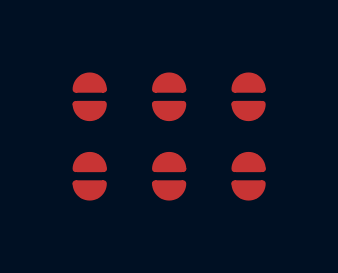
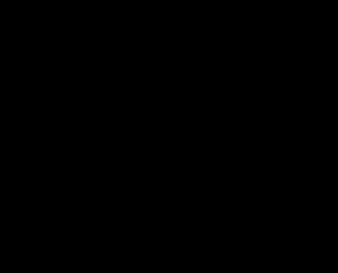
part: (89, 96) -> none
part: (169, 96) -> none
part: (248, 96) -> none
part: (89, 176) -> none
part: (169, 176) -> none
part: (248, 176) -> none

